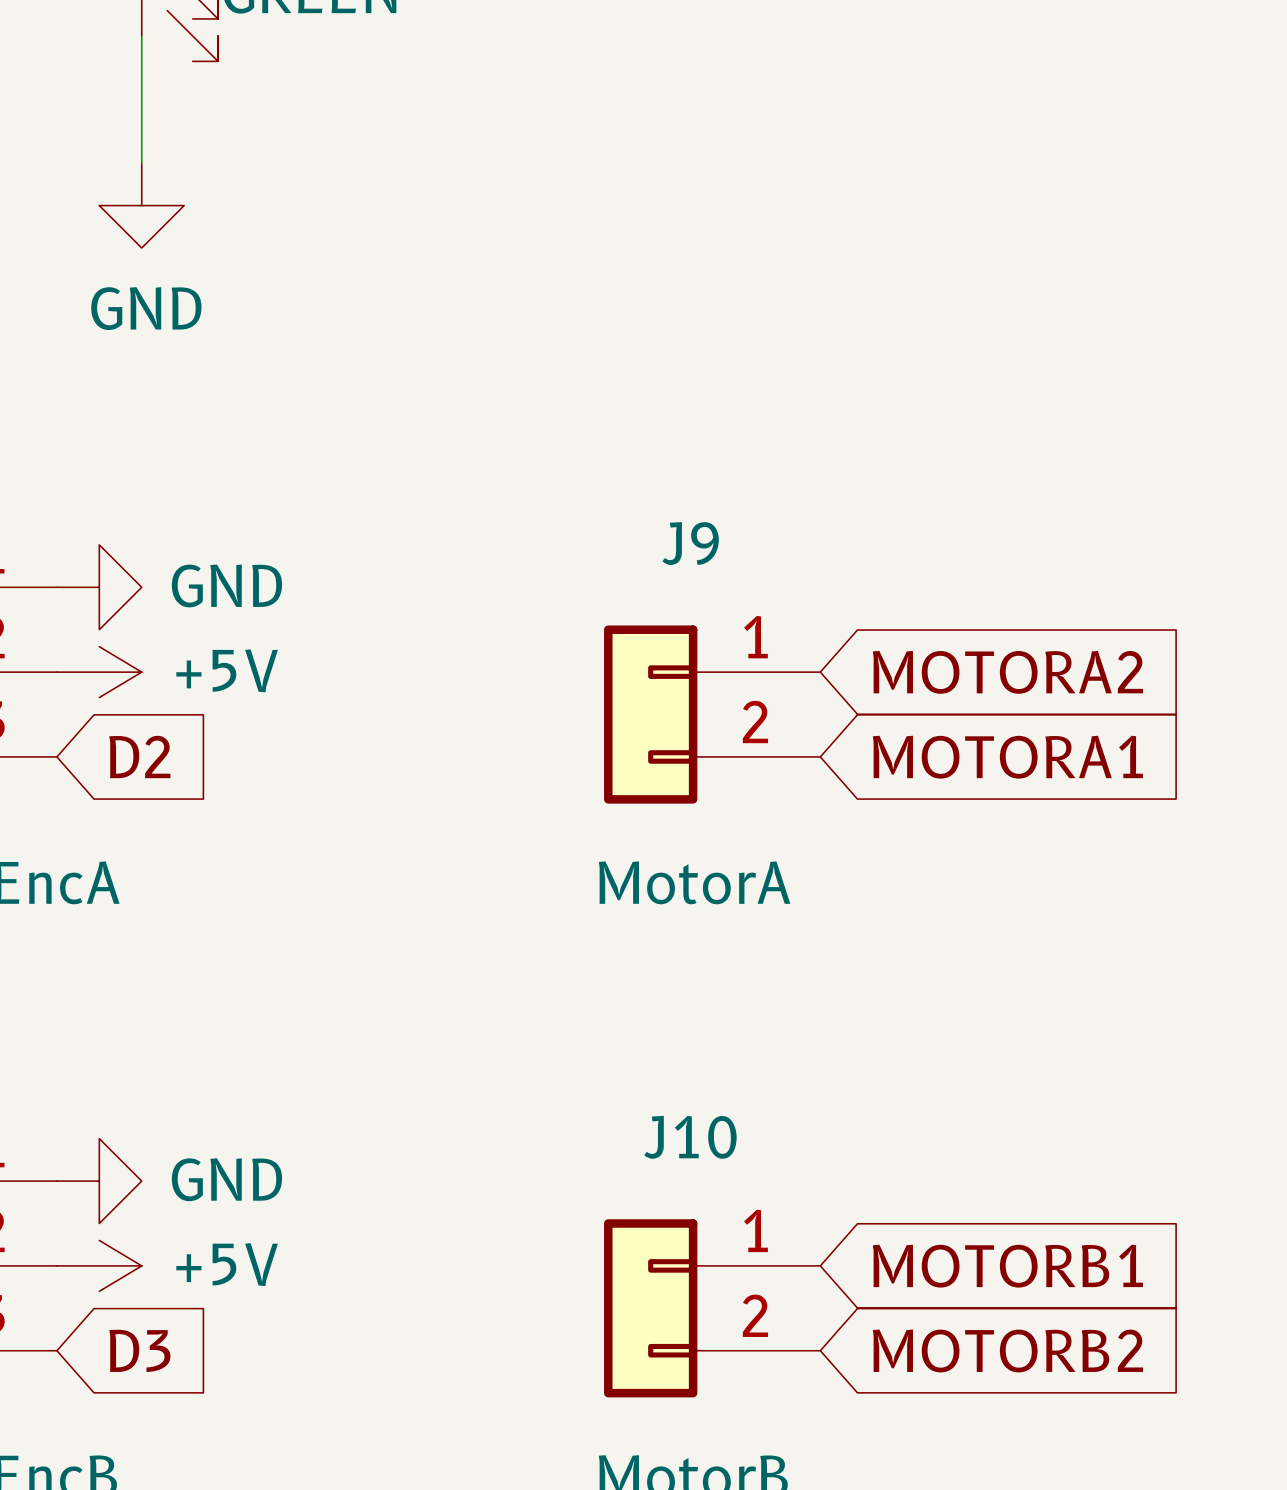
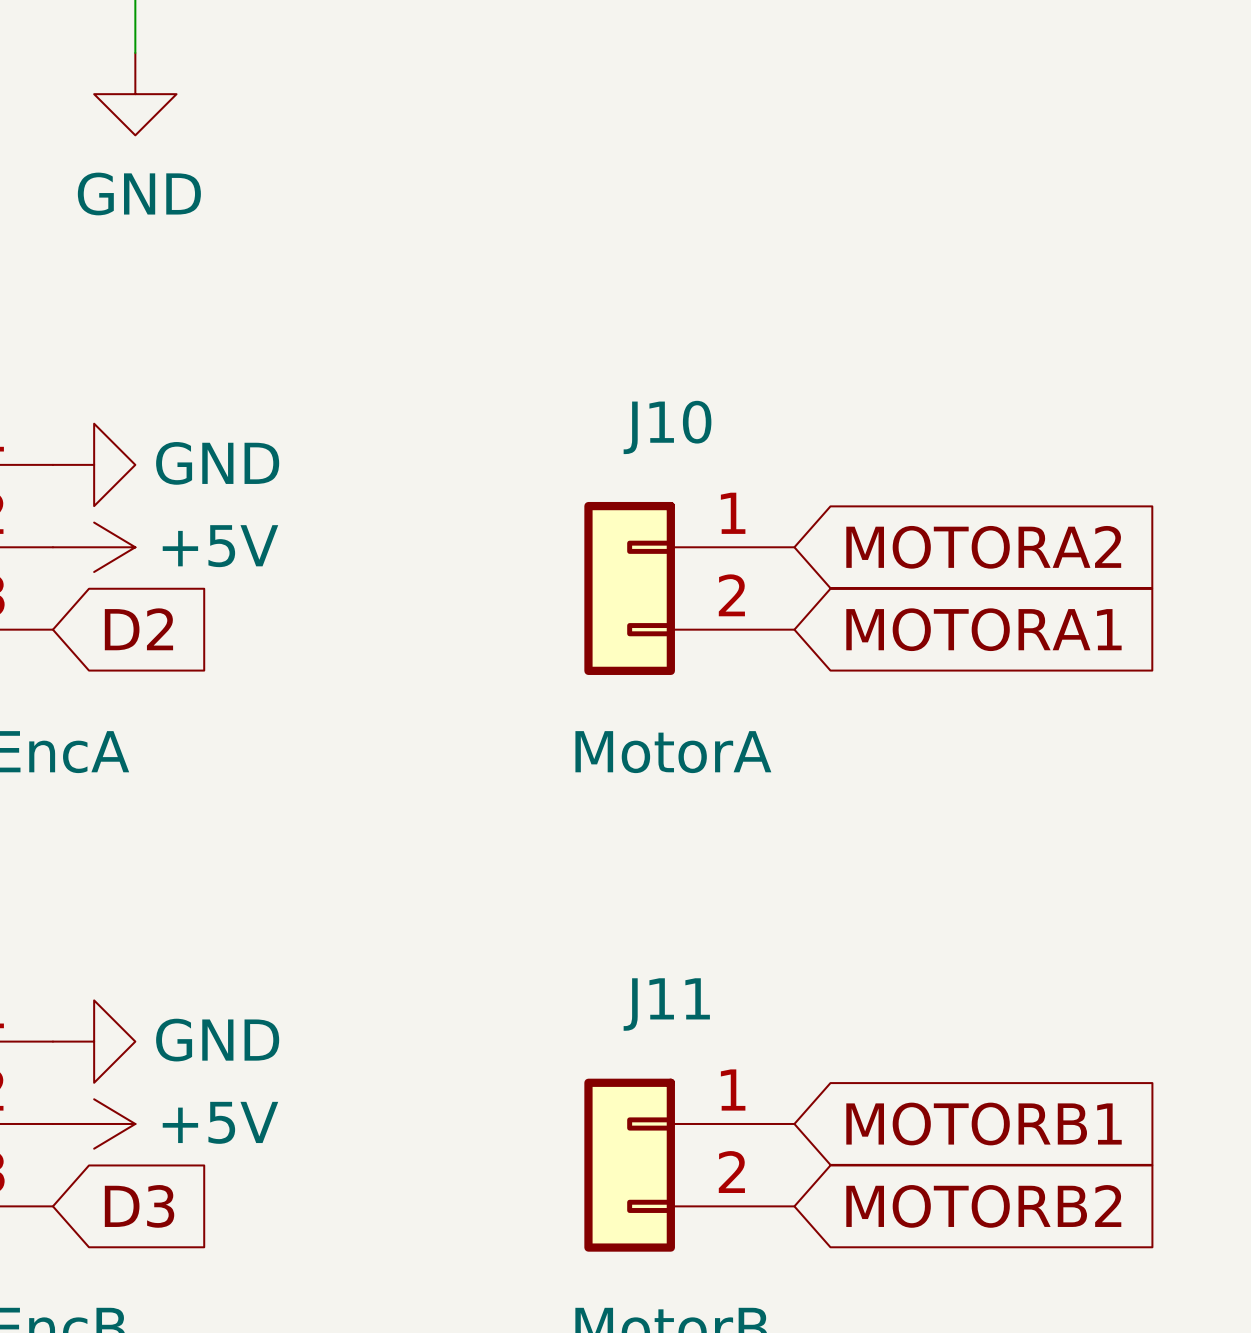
J9 name: J9 (690, 543) -> J10 (667, 427)
J10 name: J10 (690, 1137) -> J11 (666, 1004)

